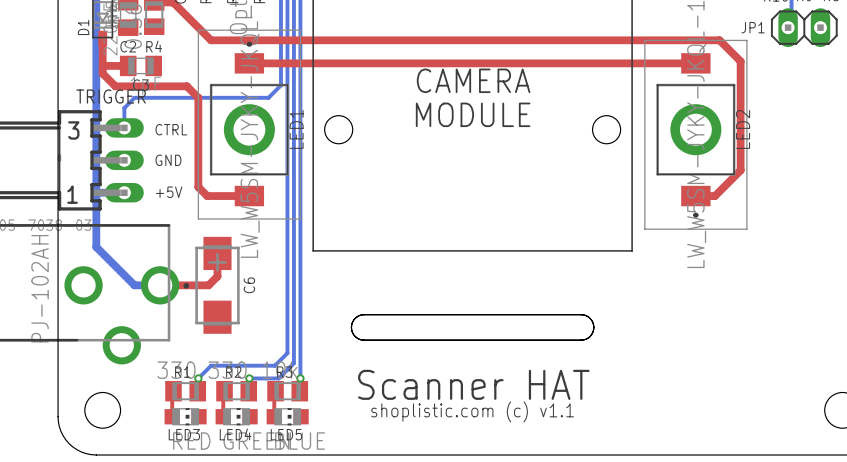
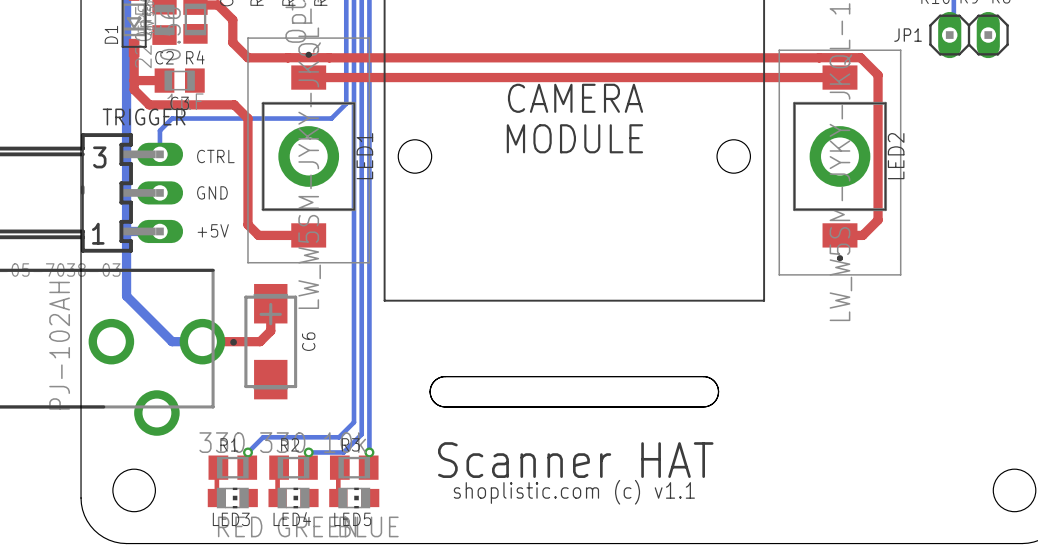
top track: (185, 14) (211, 40) (719, 40) (740, 61) (740, 170) (727, 183) -> (819, 57) (860, 57) (878, 75) (878, 220)
top track: none -> (232, 19) (232, 42) (247, 57) (287, 57)
top track: none -> (288, 57) (329, 57)
top track: none -> (329, 57) (819, 57)

